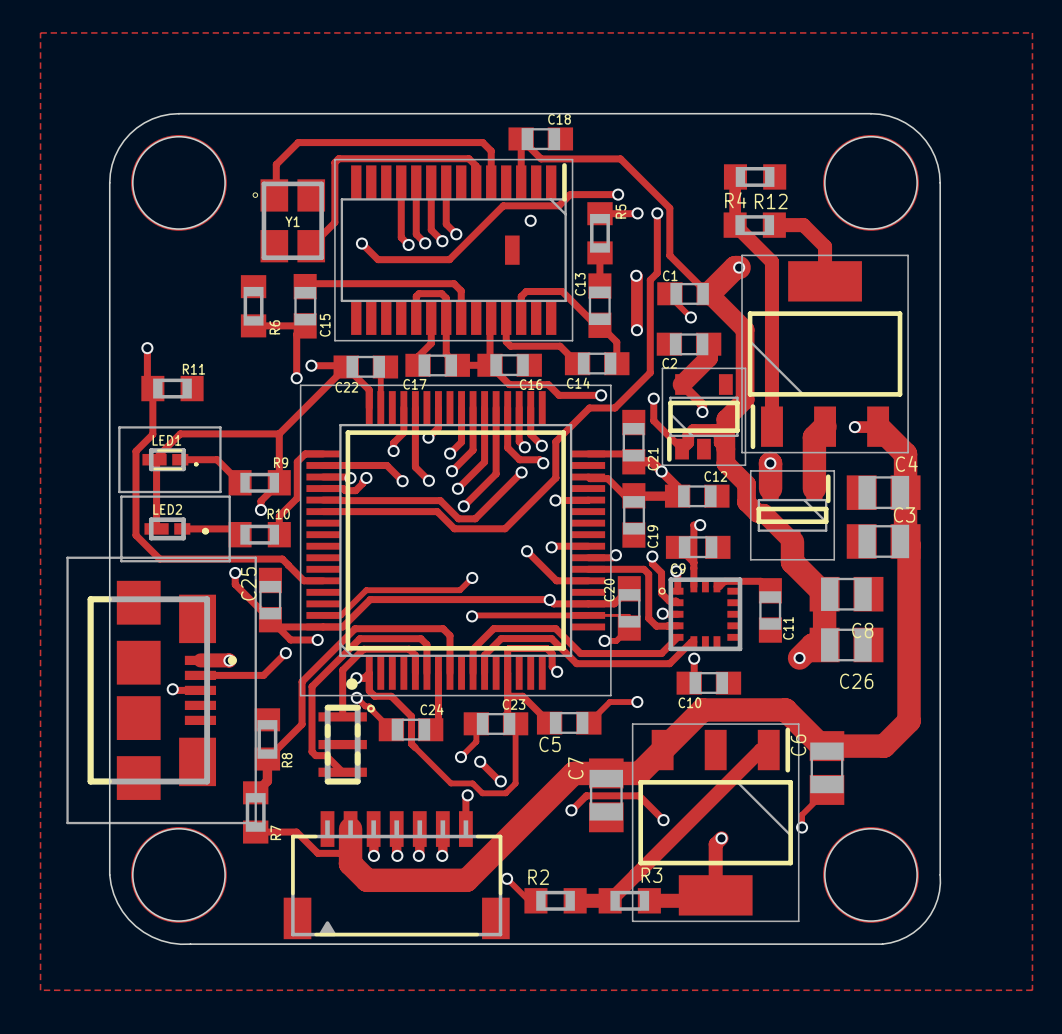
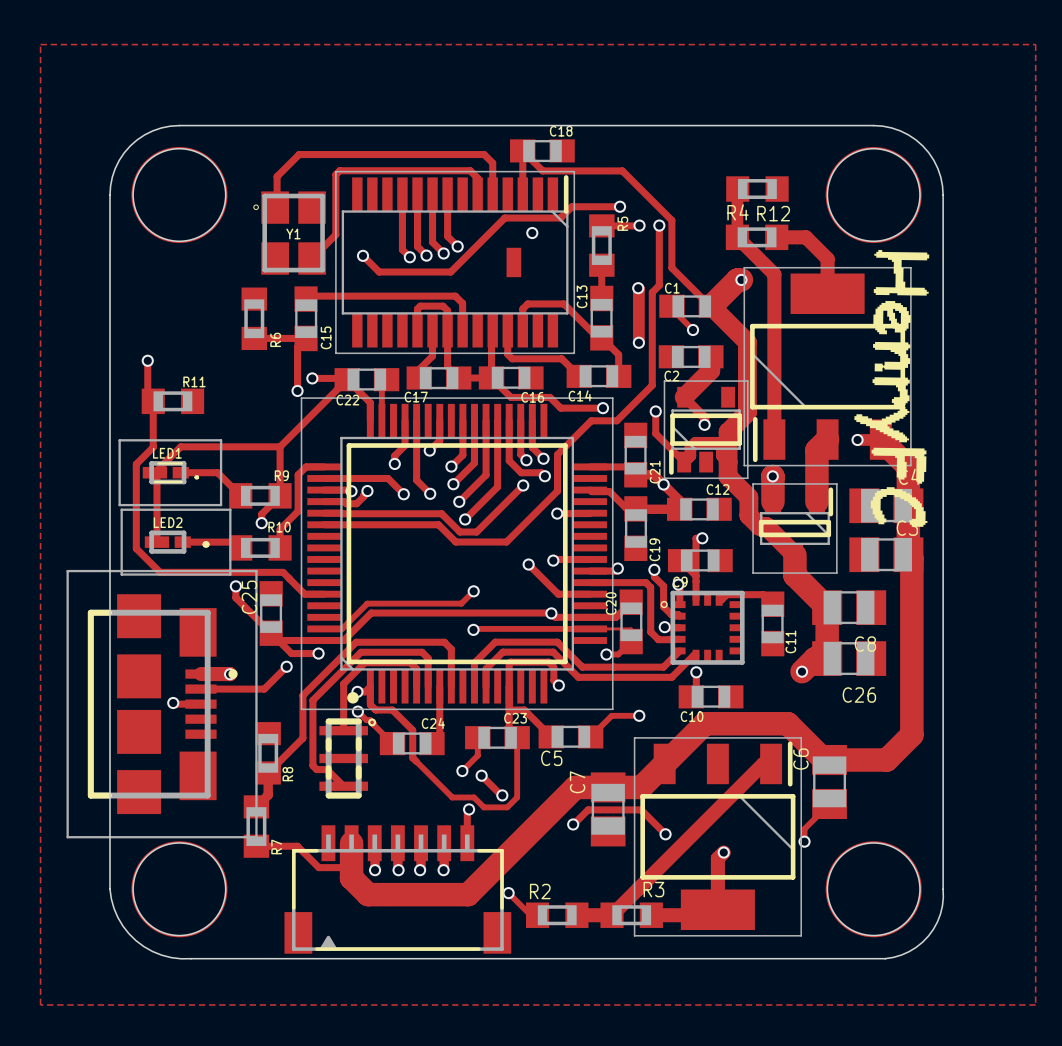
drawing: none -> [854, 249, 930, 527]

